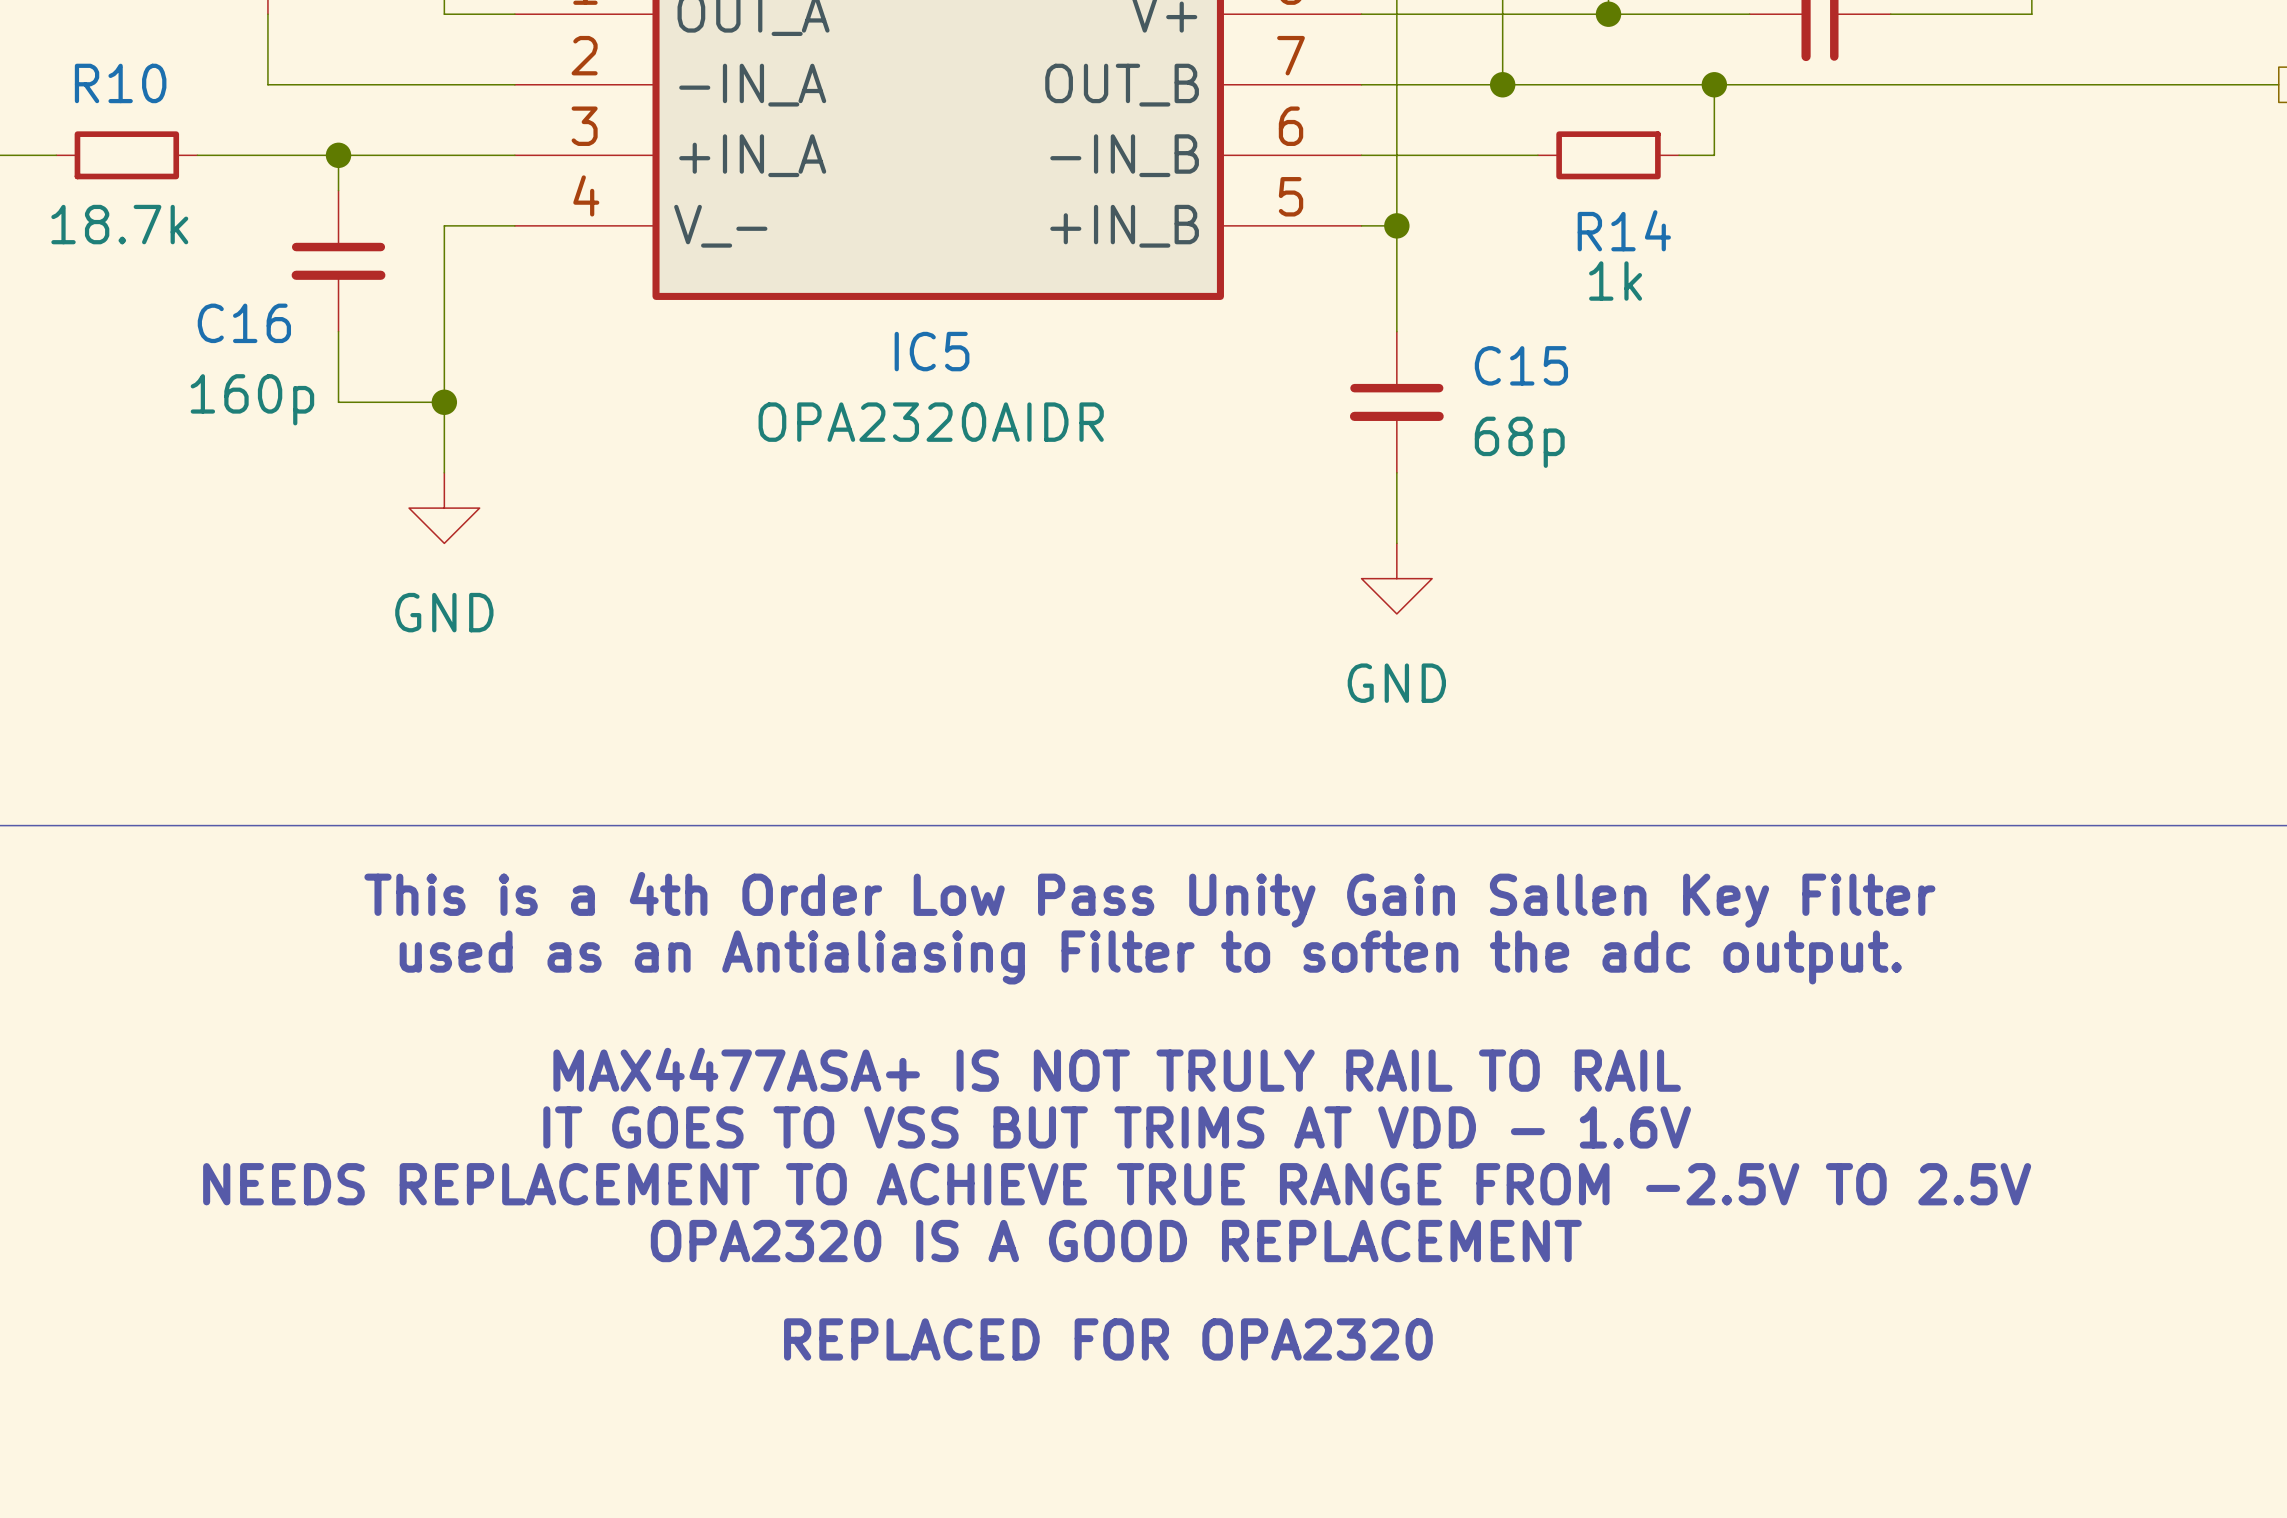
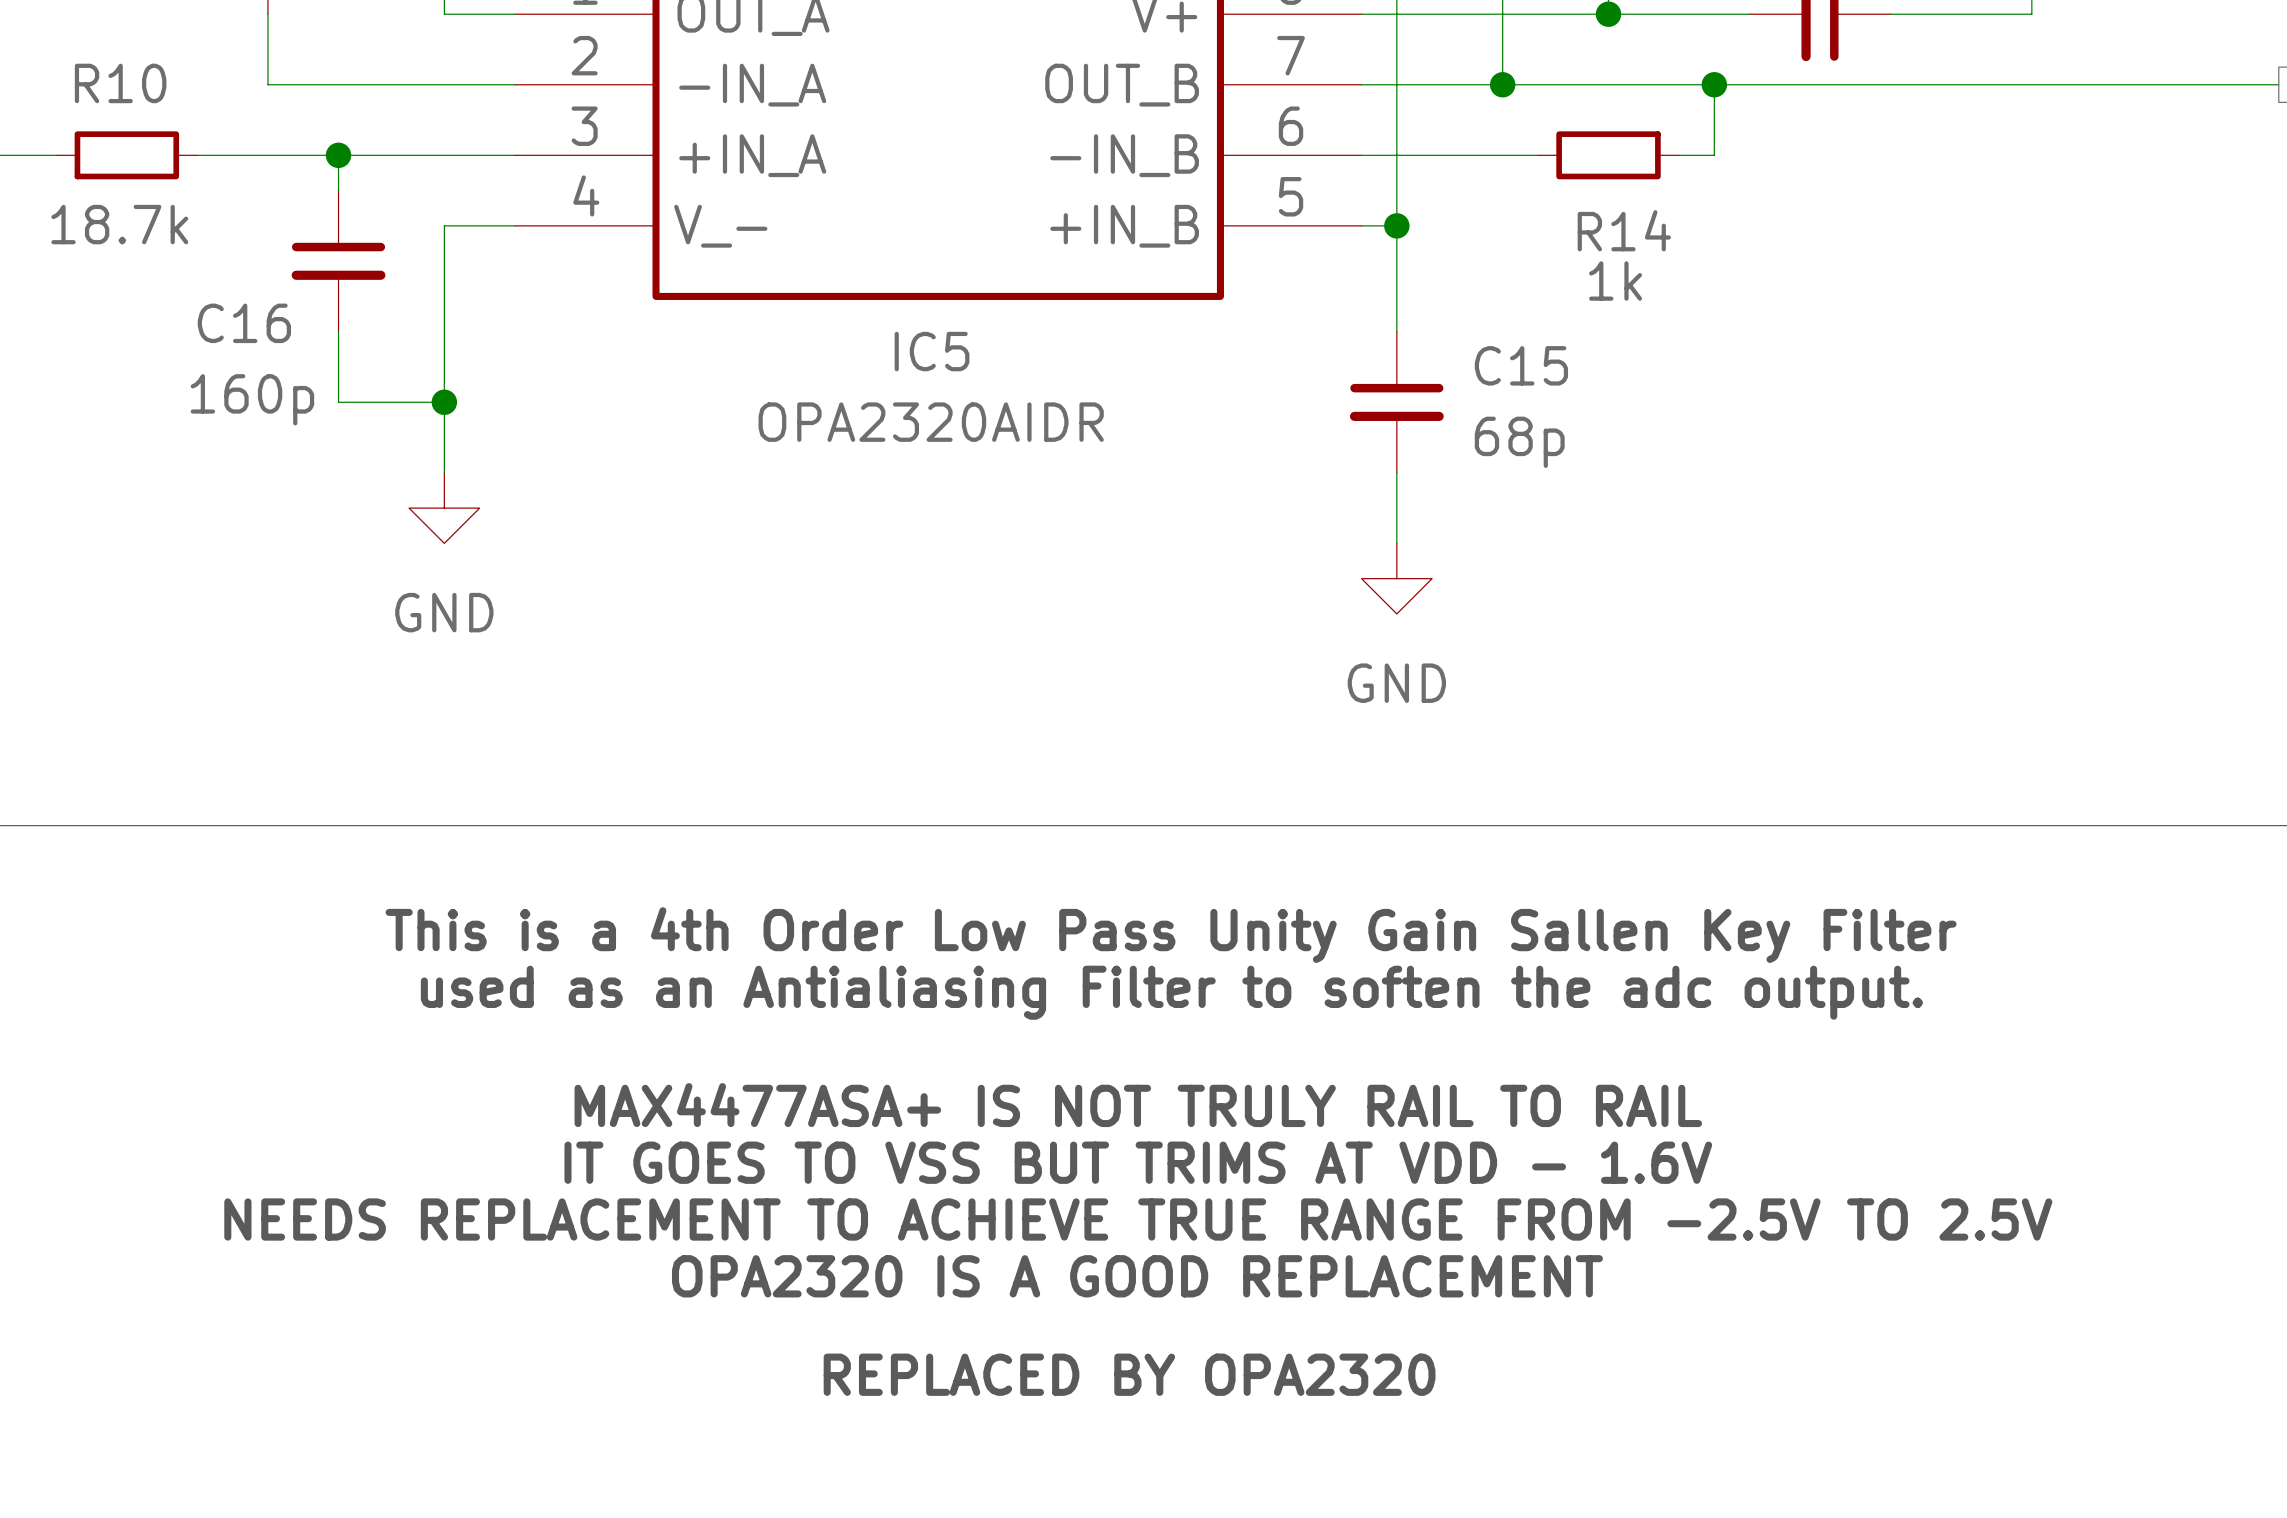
text position: This is a 4th Order Low Pass Unity Gain Sallen Key Filter (1149, 899) -> This is a 4th Order Low Pass Unity Gain Sallen Key Filter (1171, 935)
text position: used as an Antialiasing Filter to soften the adc output. (1150, 957) -> used as an Antialiasing Filter to soften the adc output. (1171, 992)
text position: MAX4477ASA+ IS NOT TRULY RAIL TO RAIL (1117, 1069) -> MAX4477ASA+ IS NOT TRULY RAIL TO RAIL (1138, 1105)
text position: IT GOES TO VSS BUT TRIMS AT VDD - 1.6V (1117, 1127) -> IT GOES TO VSS BUT TRIMS AT VDD - 1.6V (1138, 1162)
text position: NEEDS REPLACEMENT TO ACHIEVE TRUE RANGE FROM -2.5V TO 2.5V (1117, 1184) -> NEEDS REPLACEMENT TO ACHIEVE TRUE RANGE FROM -2.5V TO 2.5V (1138, 1219)
text position: OPA2320 IS A GOOD REPLACEMENT (1116, 1241) -> OPA2320 IS A GOOD REPLACEMENT (1137, 1276)
text: REPLACED FOR OPA2320 (1108, 1339) -> REPLACED BY OPA2320 (1129, 1374)

